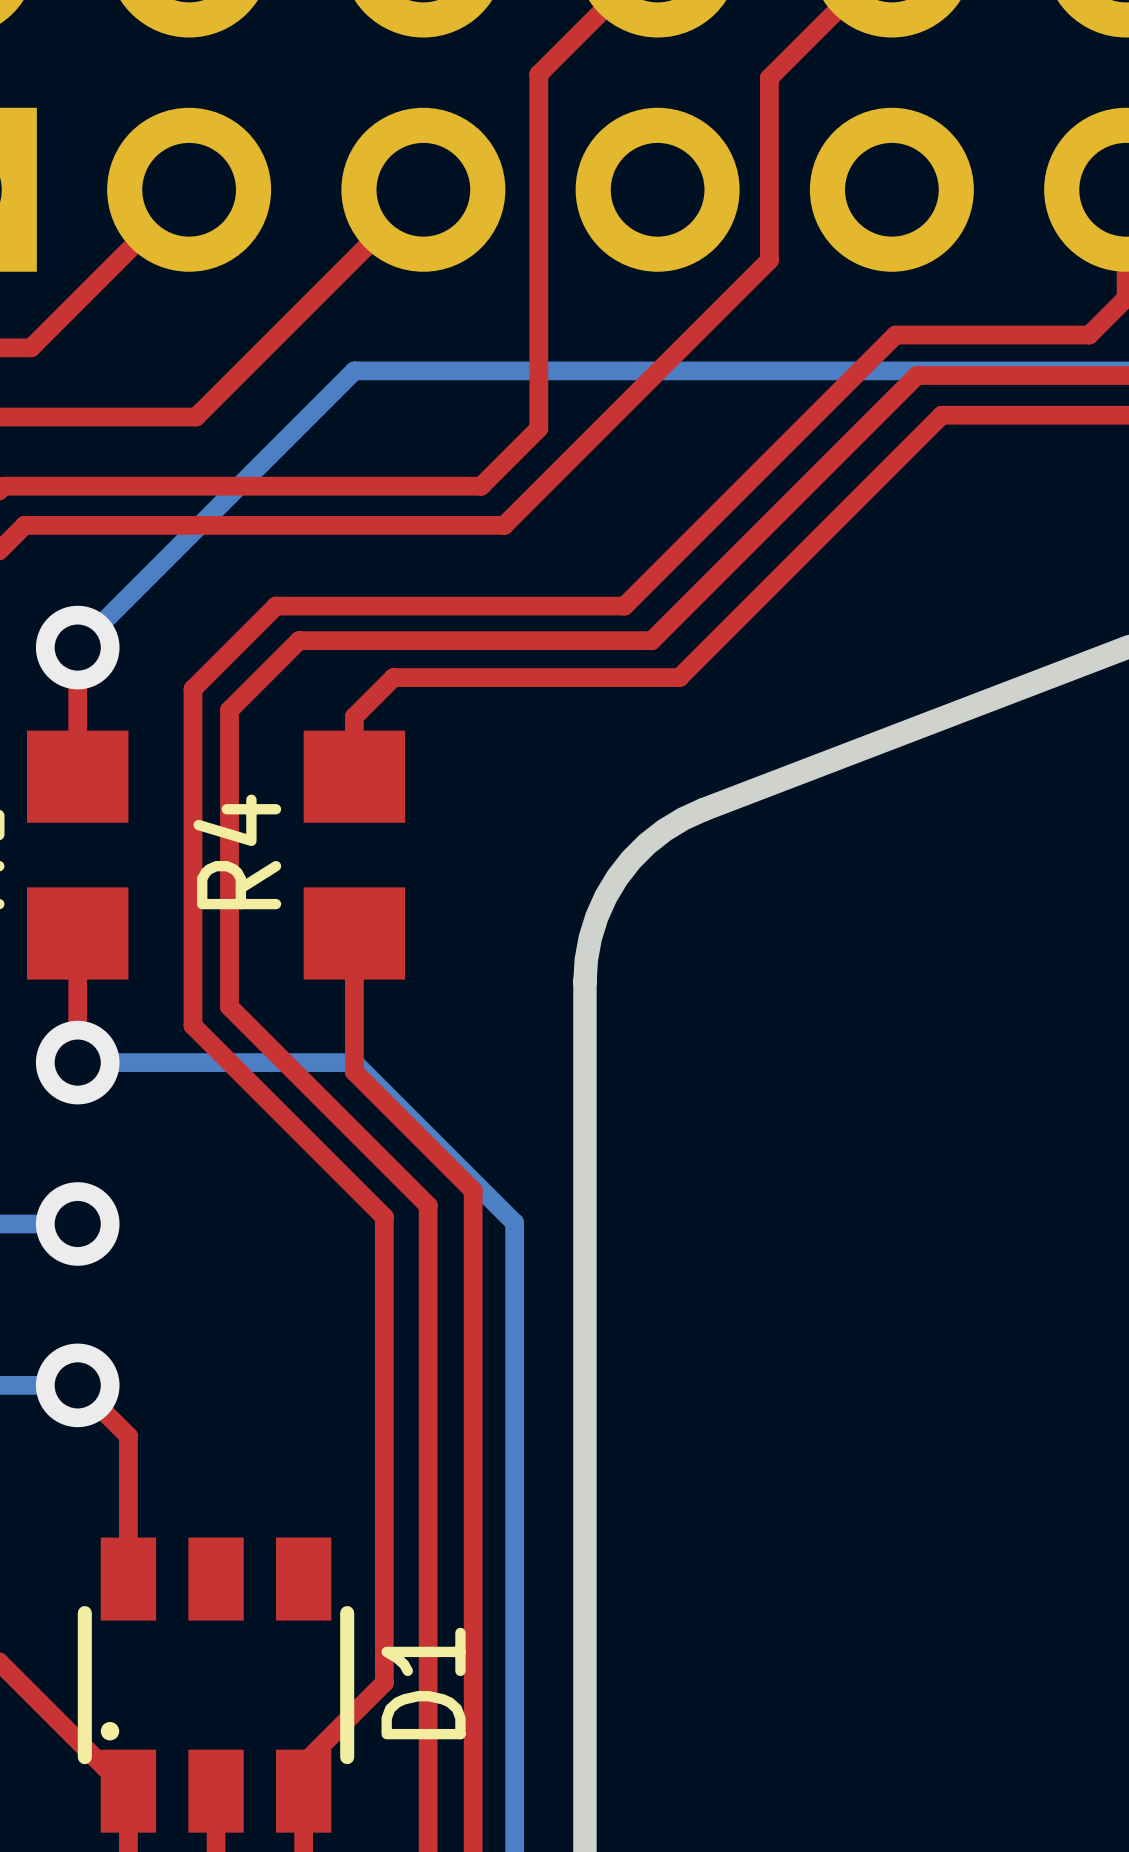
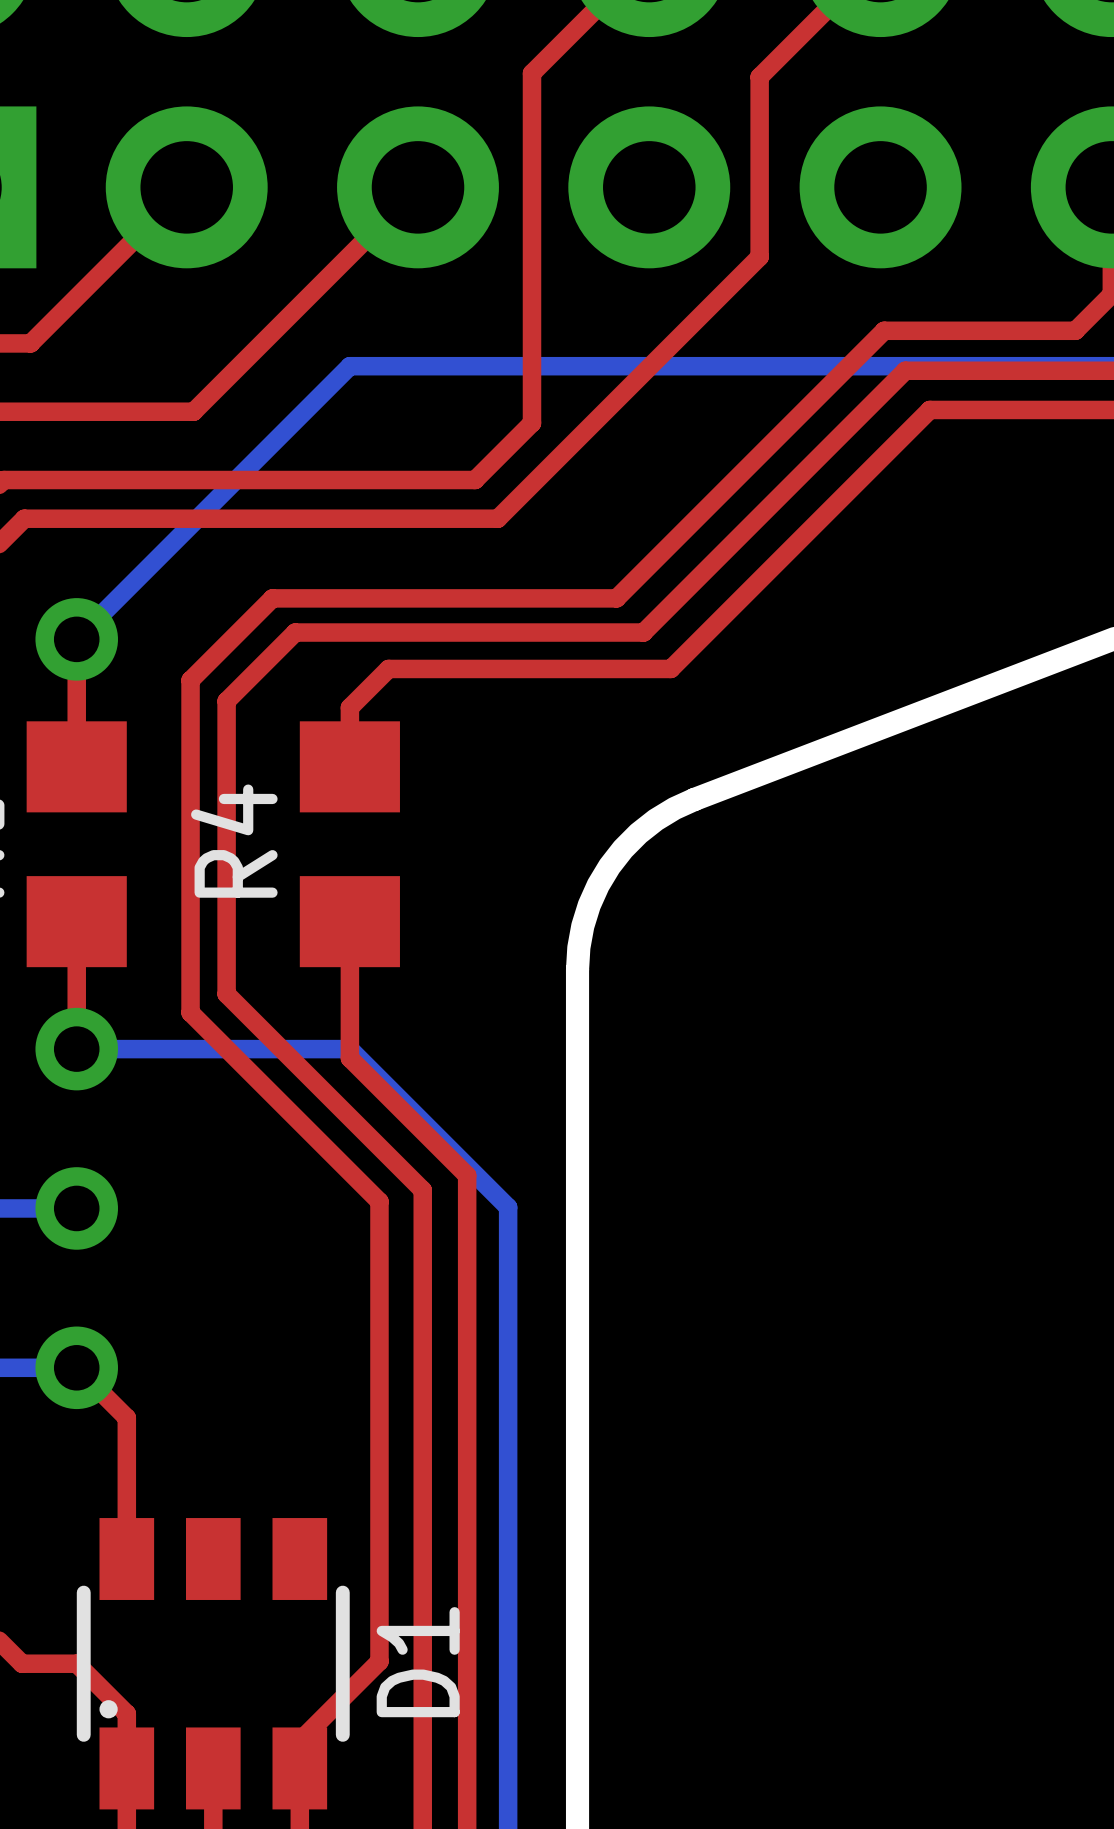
top track: (22, 1685) (128, 1791) -> (22, 1663) (76, 1663) (126, 1713) (126, 1768)

